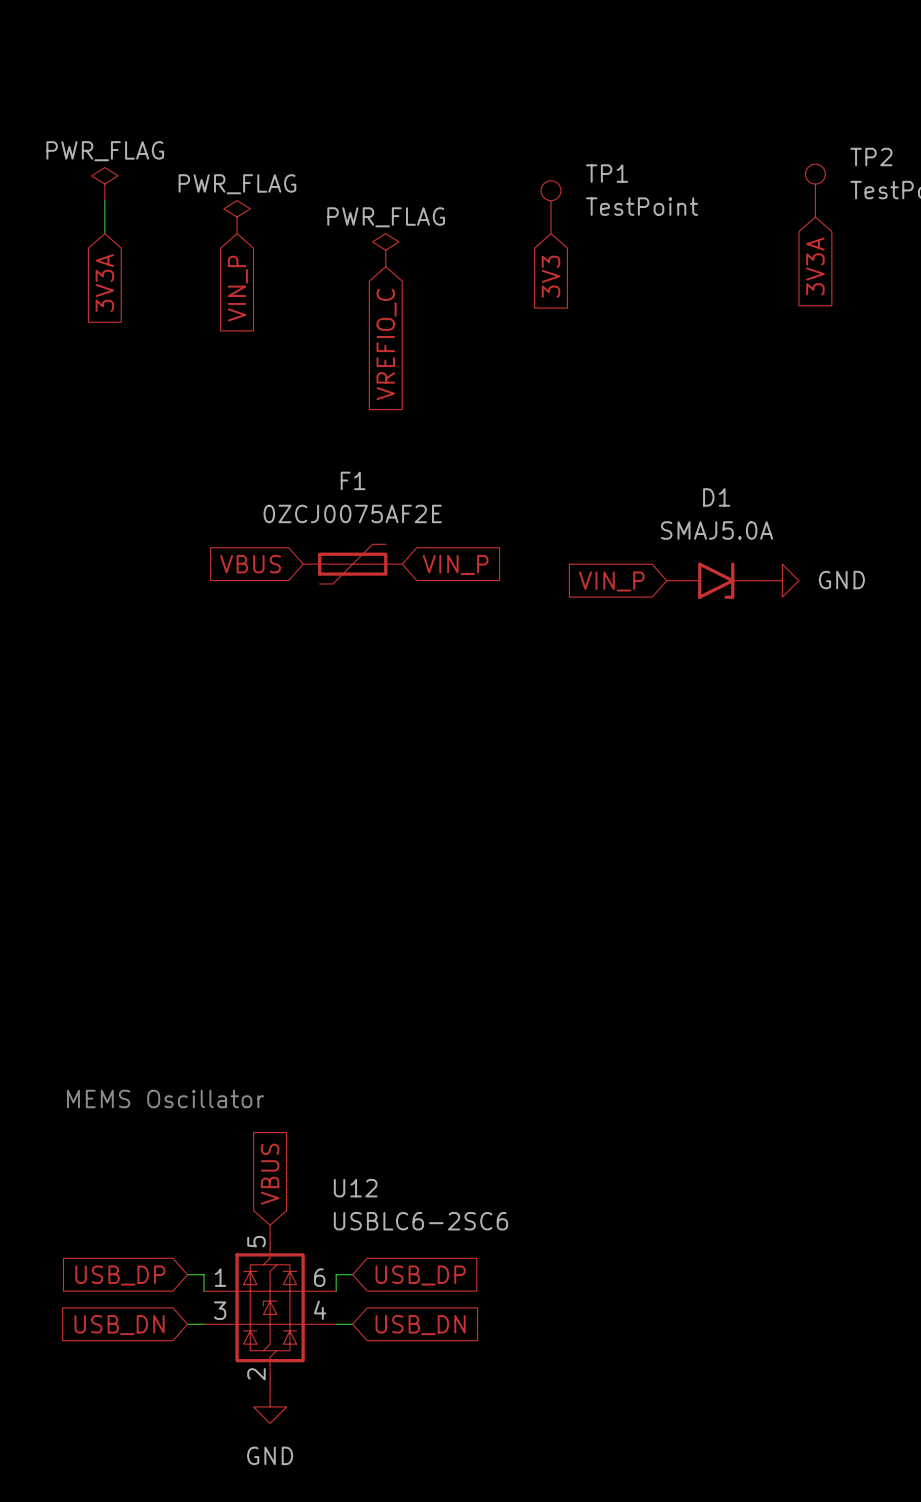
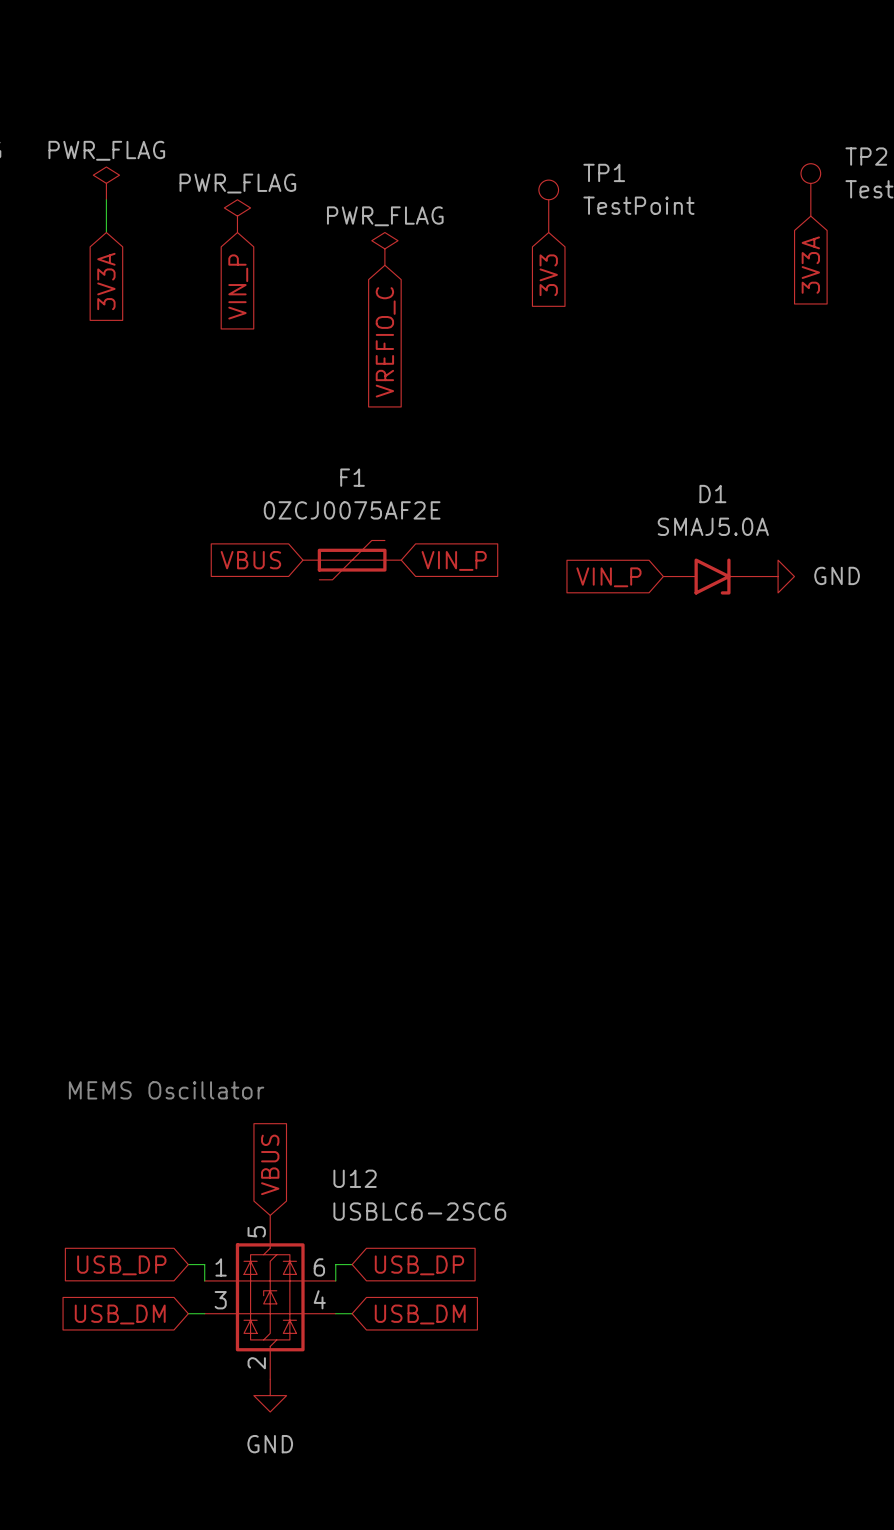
global label: USB_DN (119, 1325) -> USB_DM (120, 1314)
global label: USB_DN (420, 1325) -> USB_DM (420, 1314)

